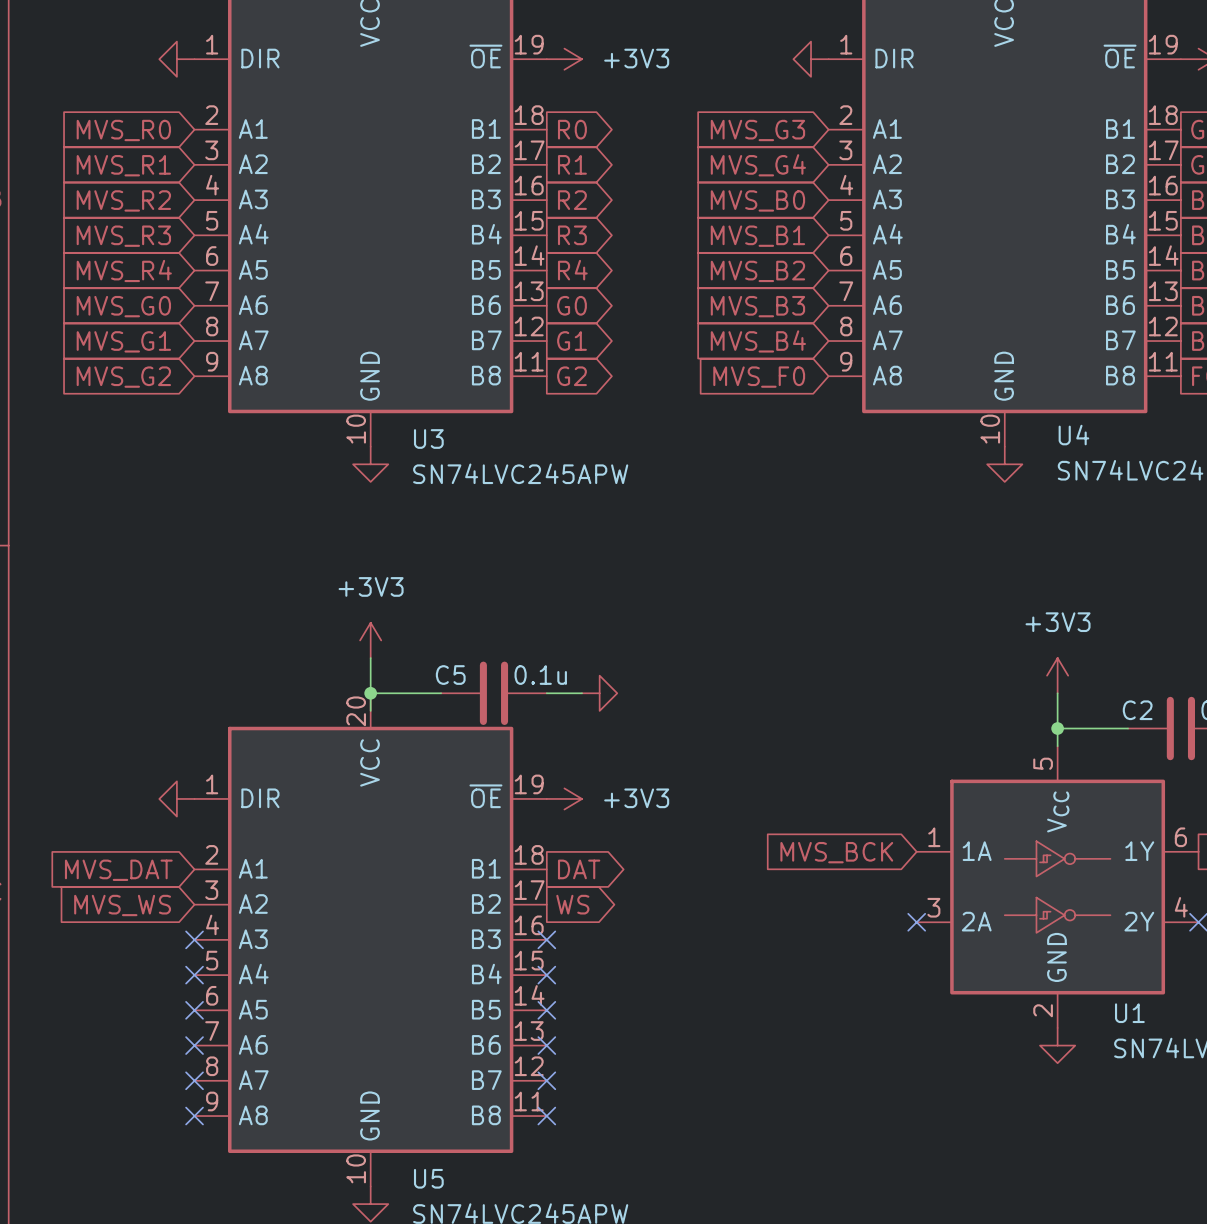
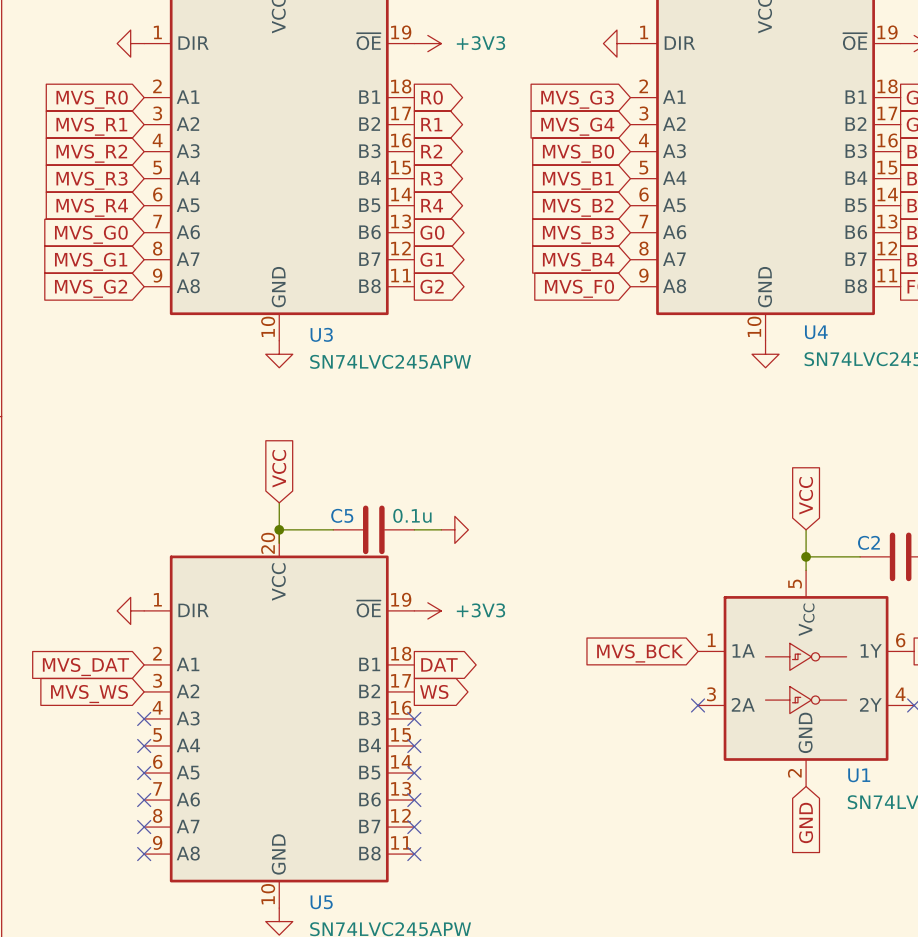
global label: none -> VCC (279, 468)
power symbol: +3V3 (370, 640) -> none
global label: none -> VCC (806, 495)
power symbol: +3V3 (1057, 675) -> none
power symbol: (1057, 1045) -> none
global label: none -> GND (806, 822)

